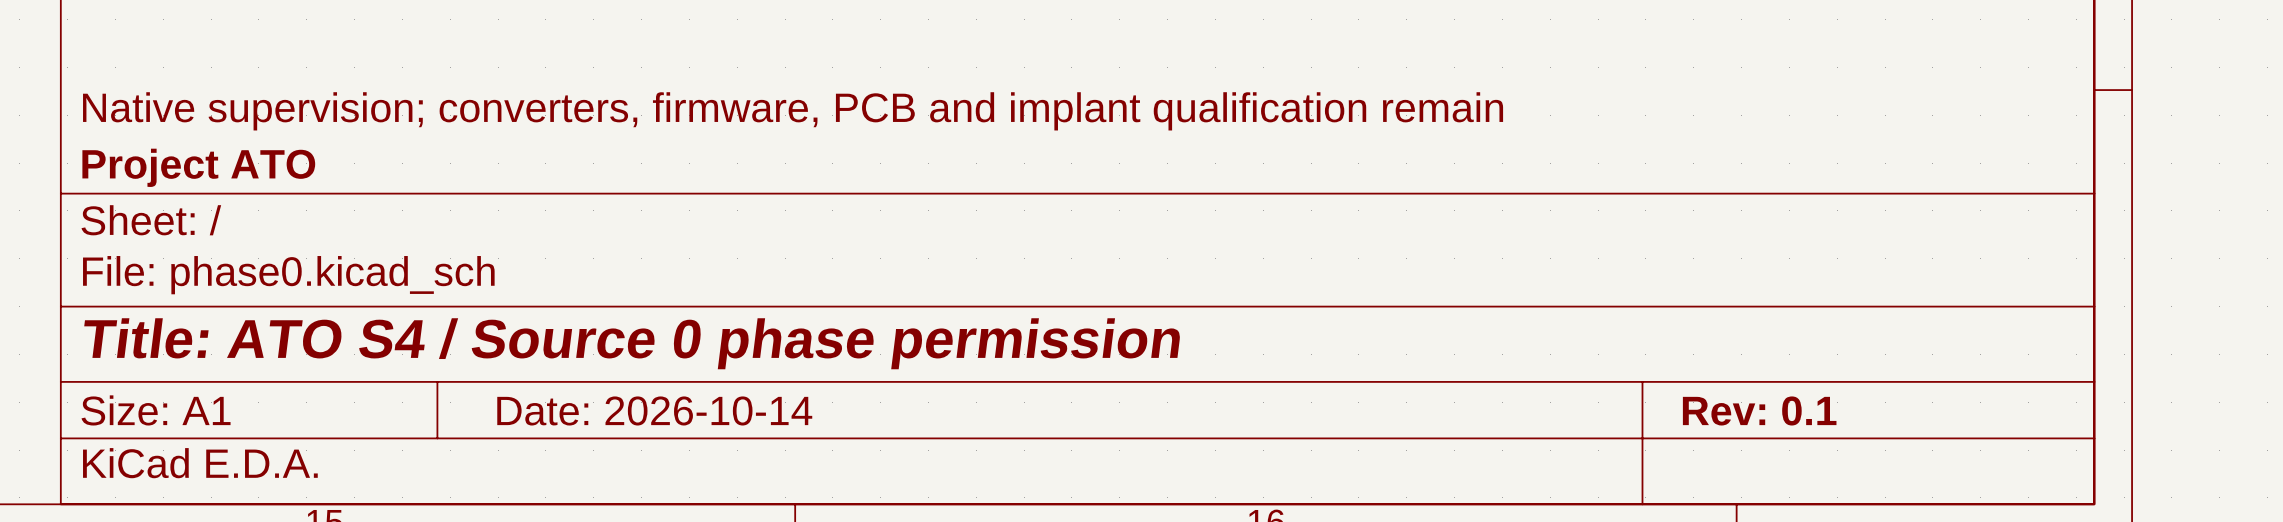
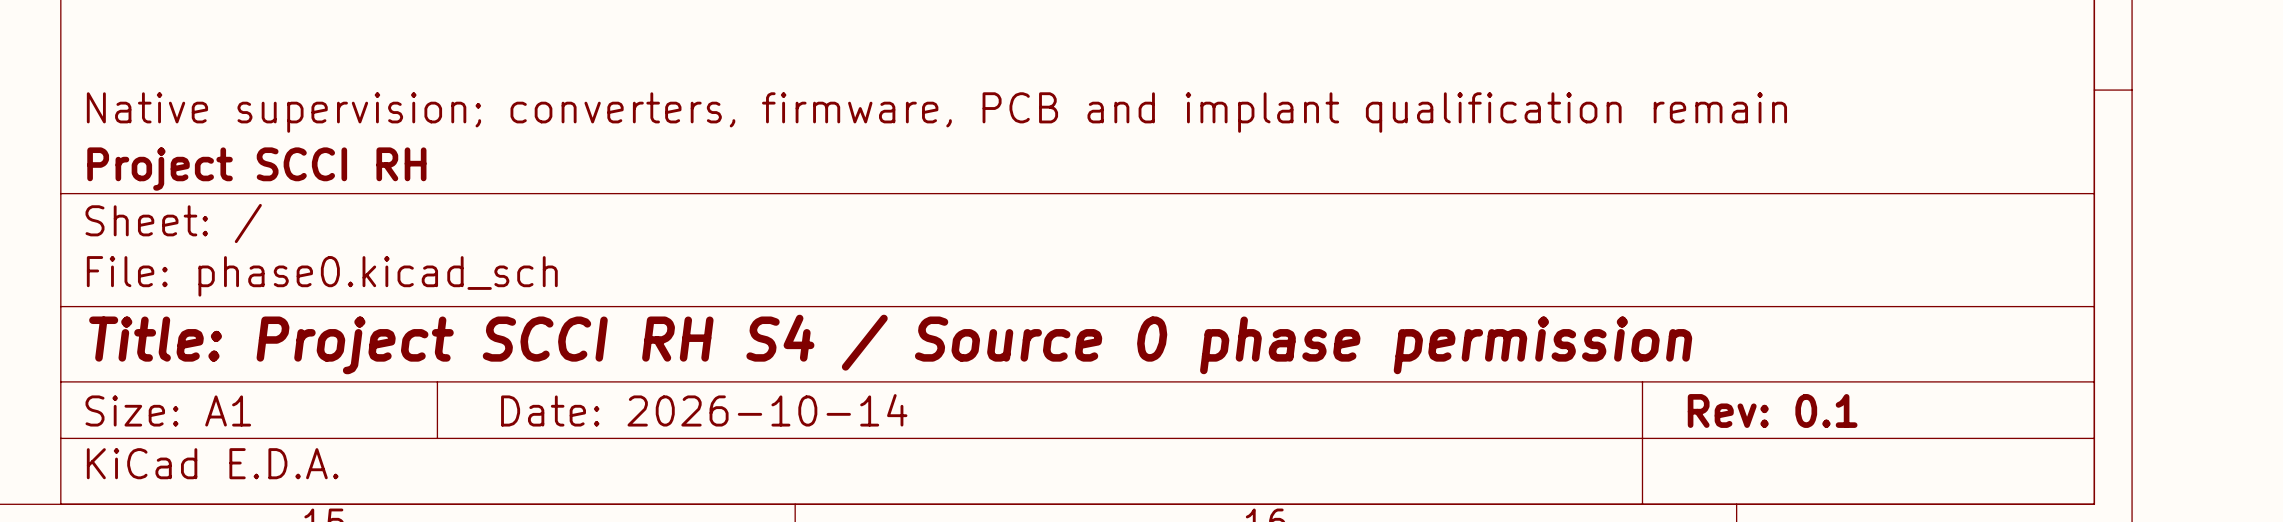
title block: Project ATO (198, 167) -> Project SCCI RH (256, 169)
title block: Title: ATO S4 / Source 0 phase permission (632, 343) -> Title: Project SCCI RH S4 / Source 0 phase permission (890, 344)

